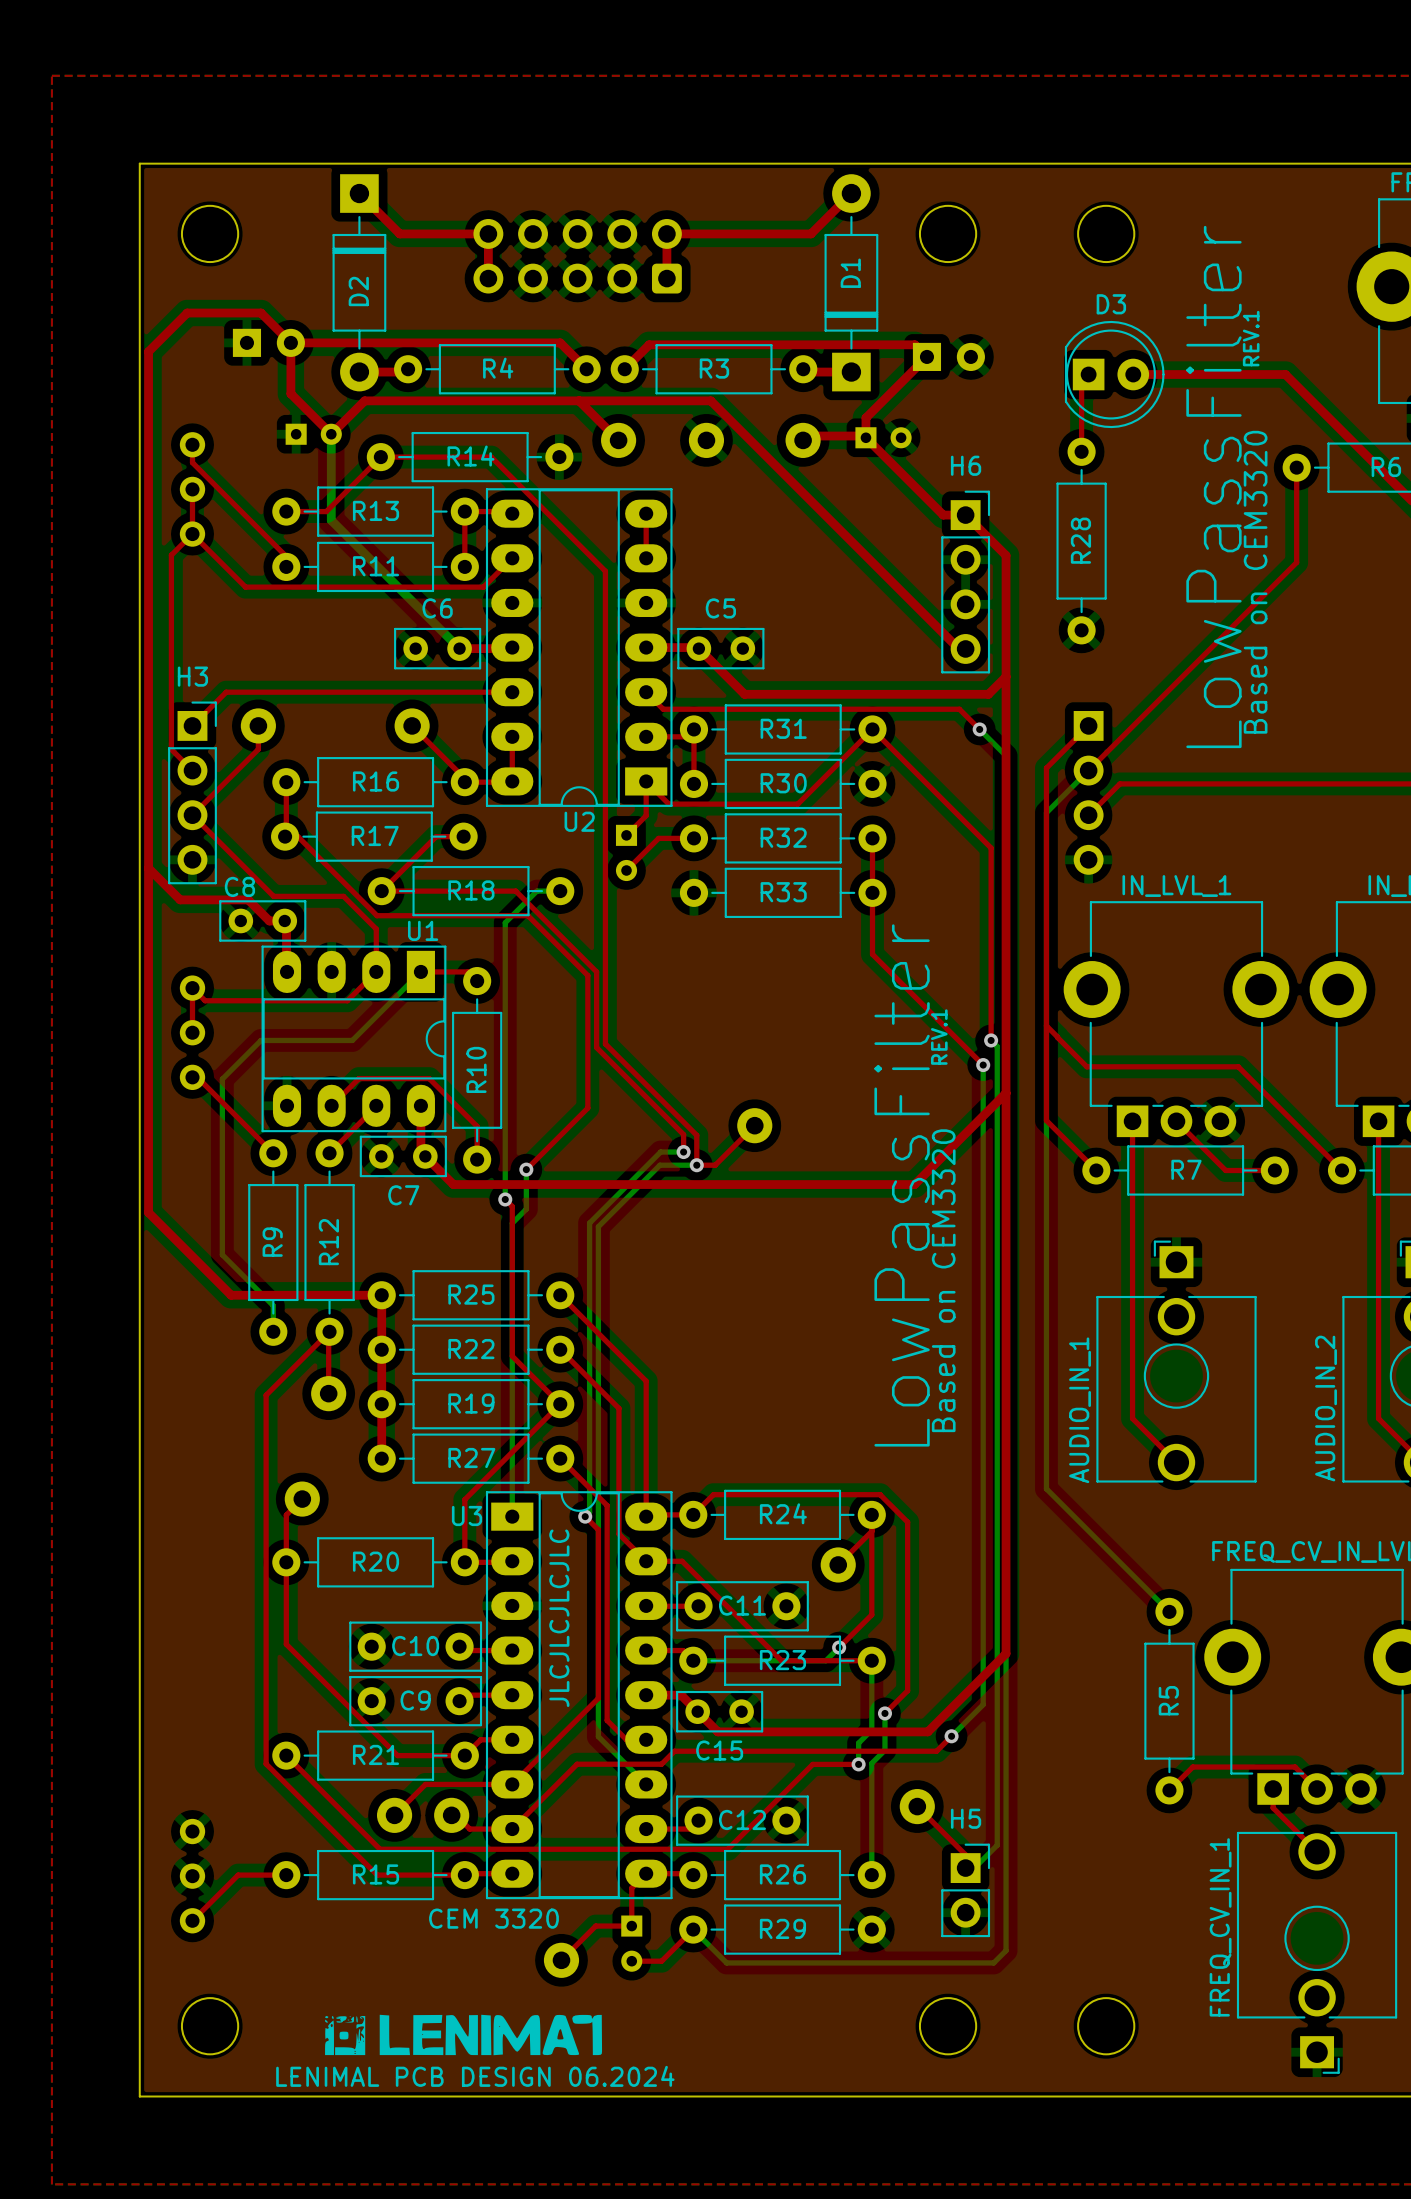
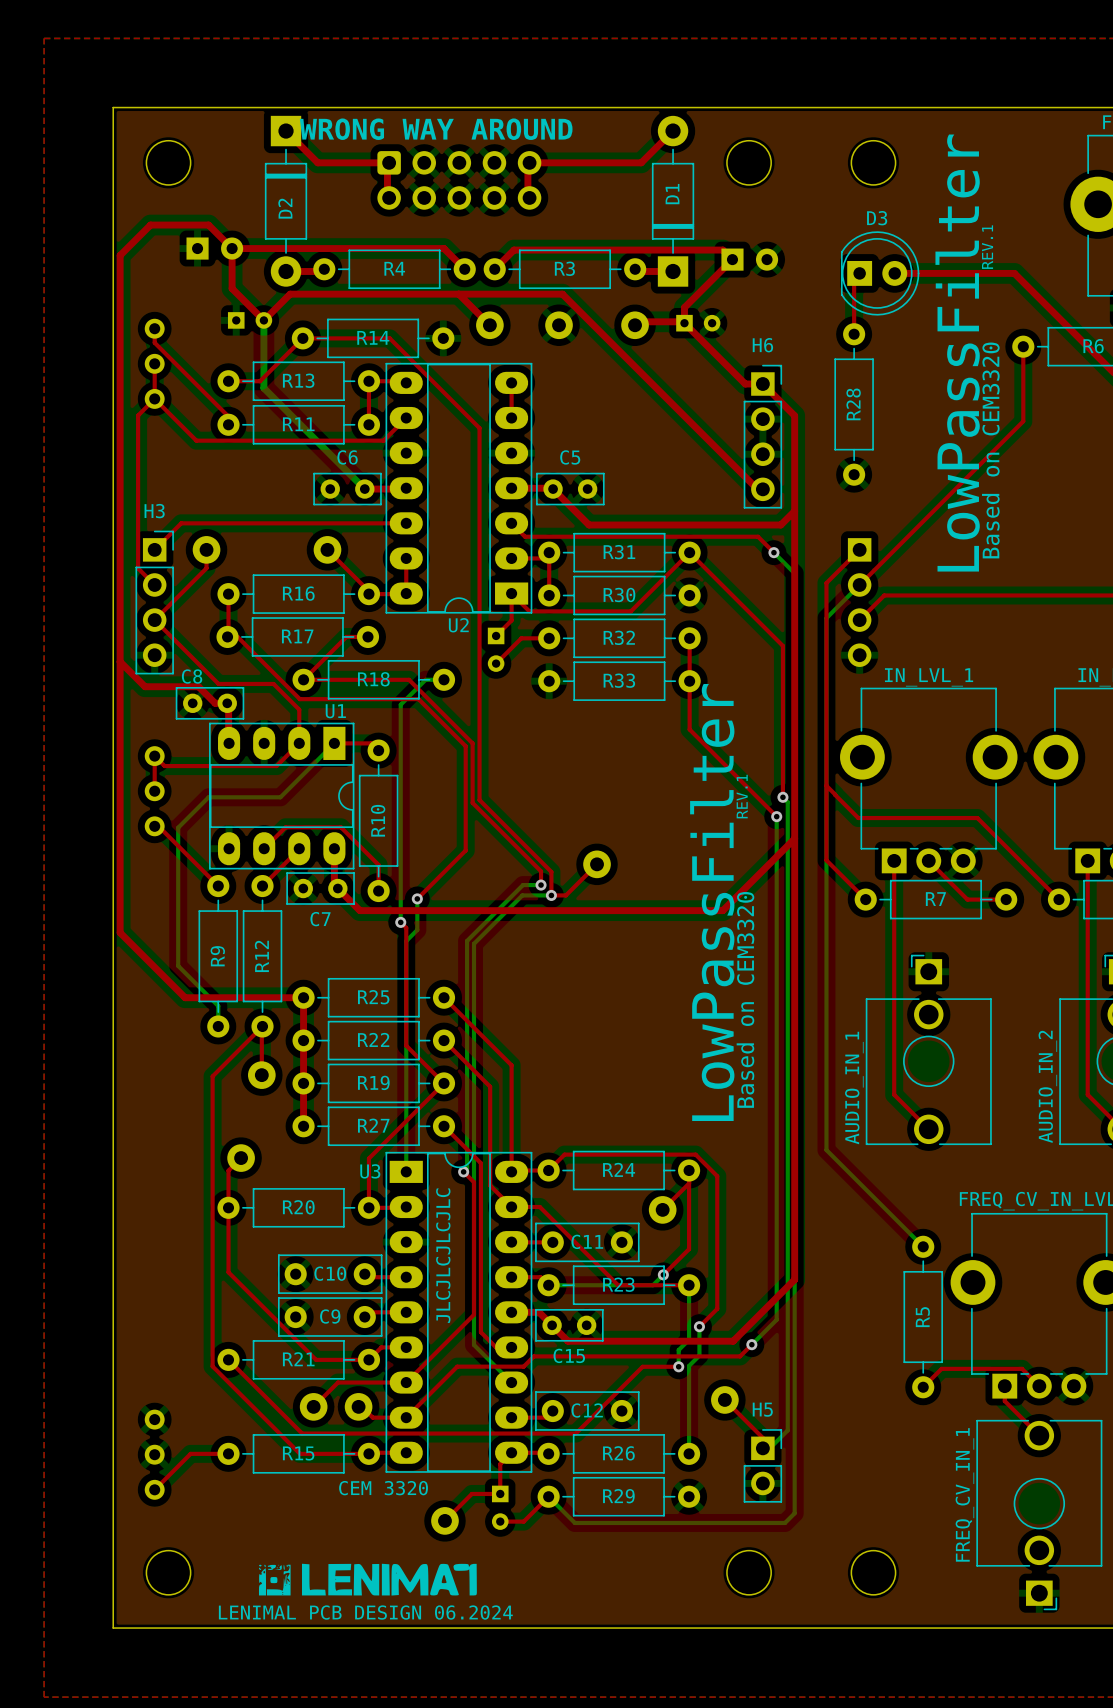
text: none -> WRONG WAY AROUND (436, 129)
part rotation: 0° (577, 256) -> 180° (459, 180)

